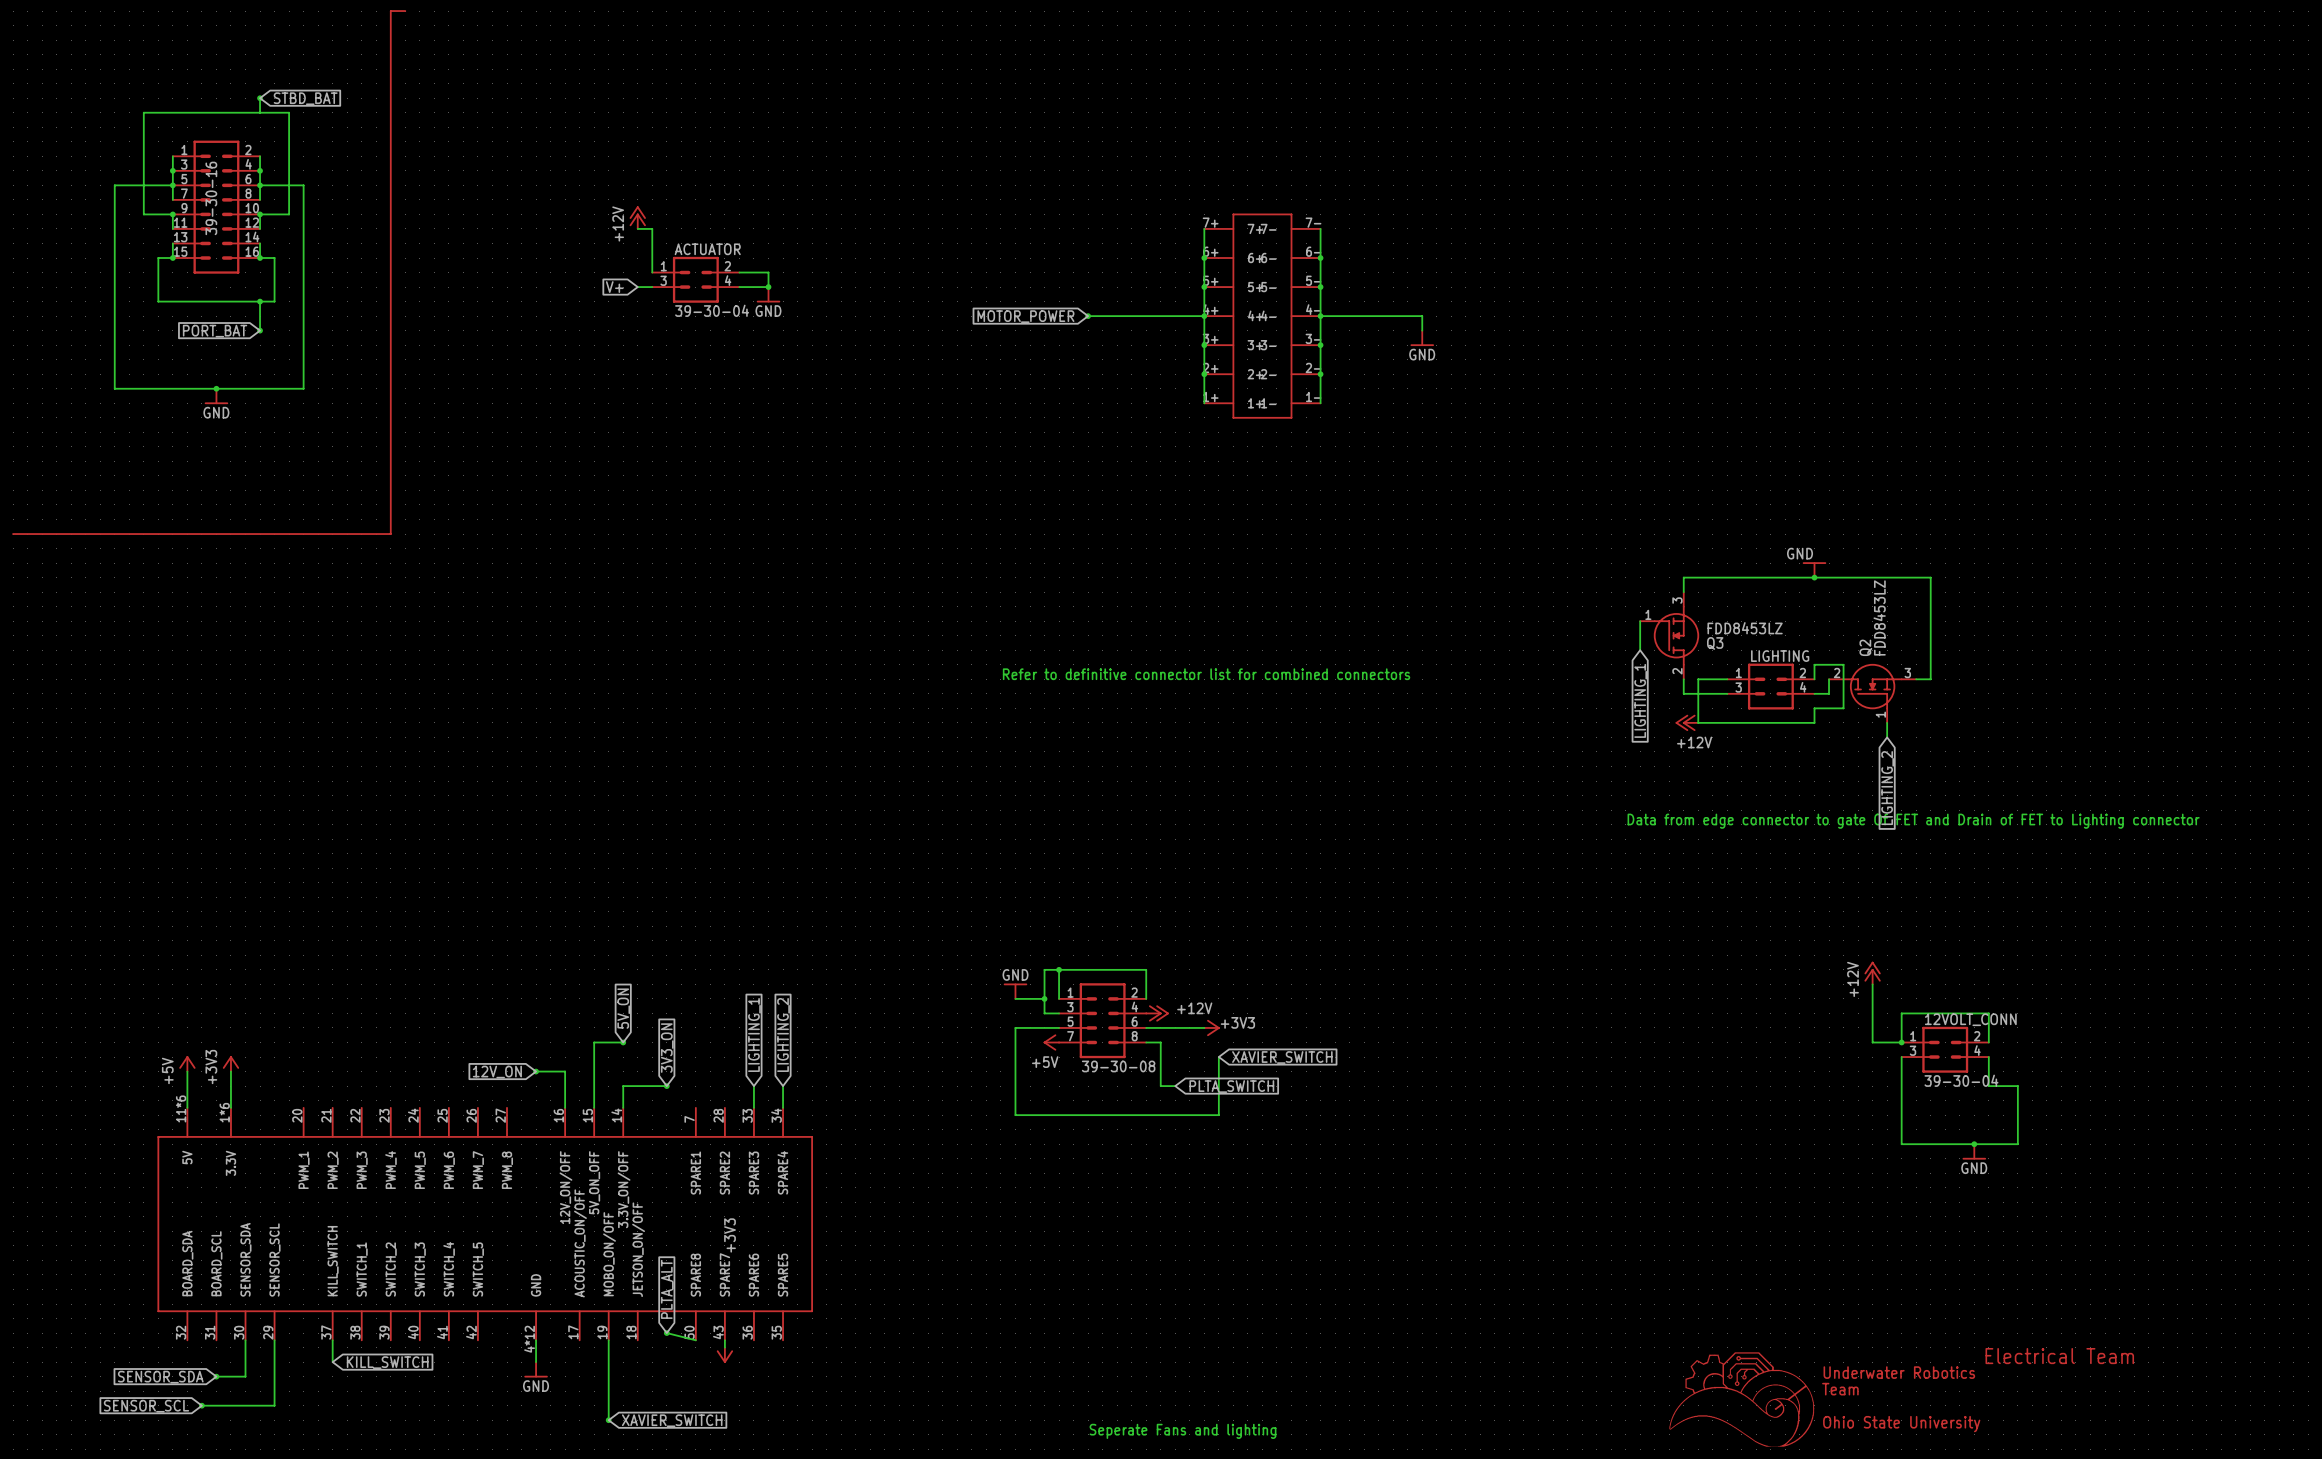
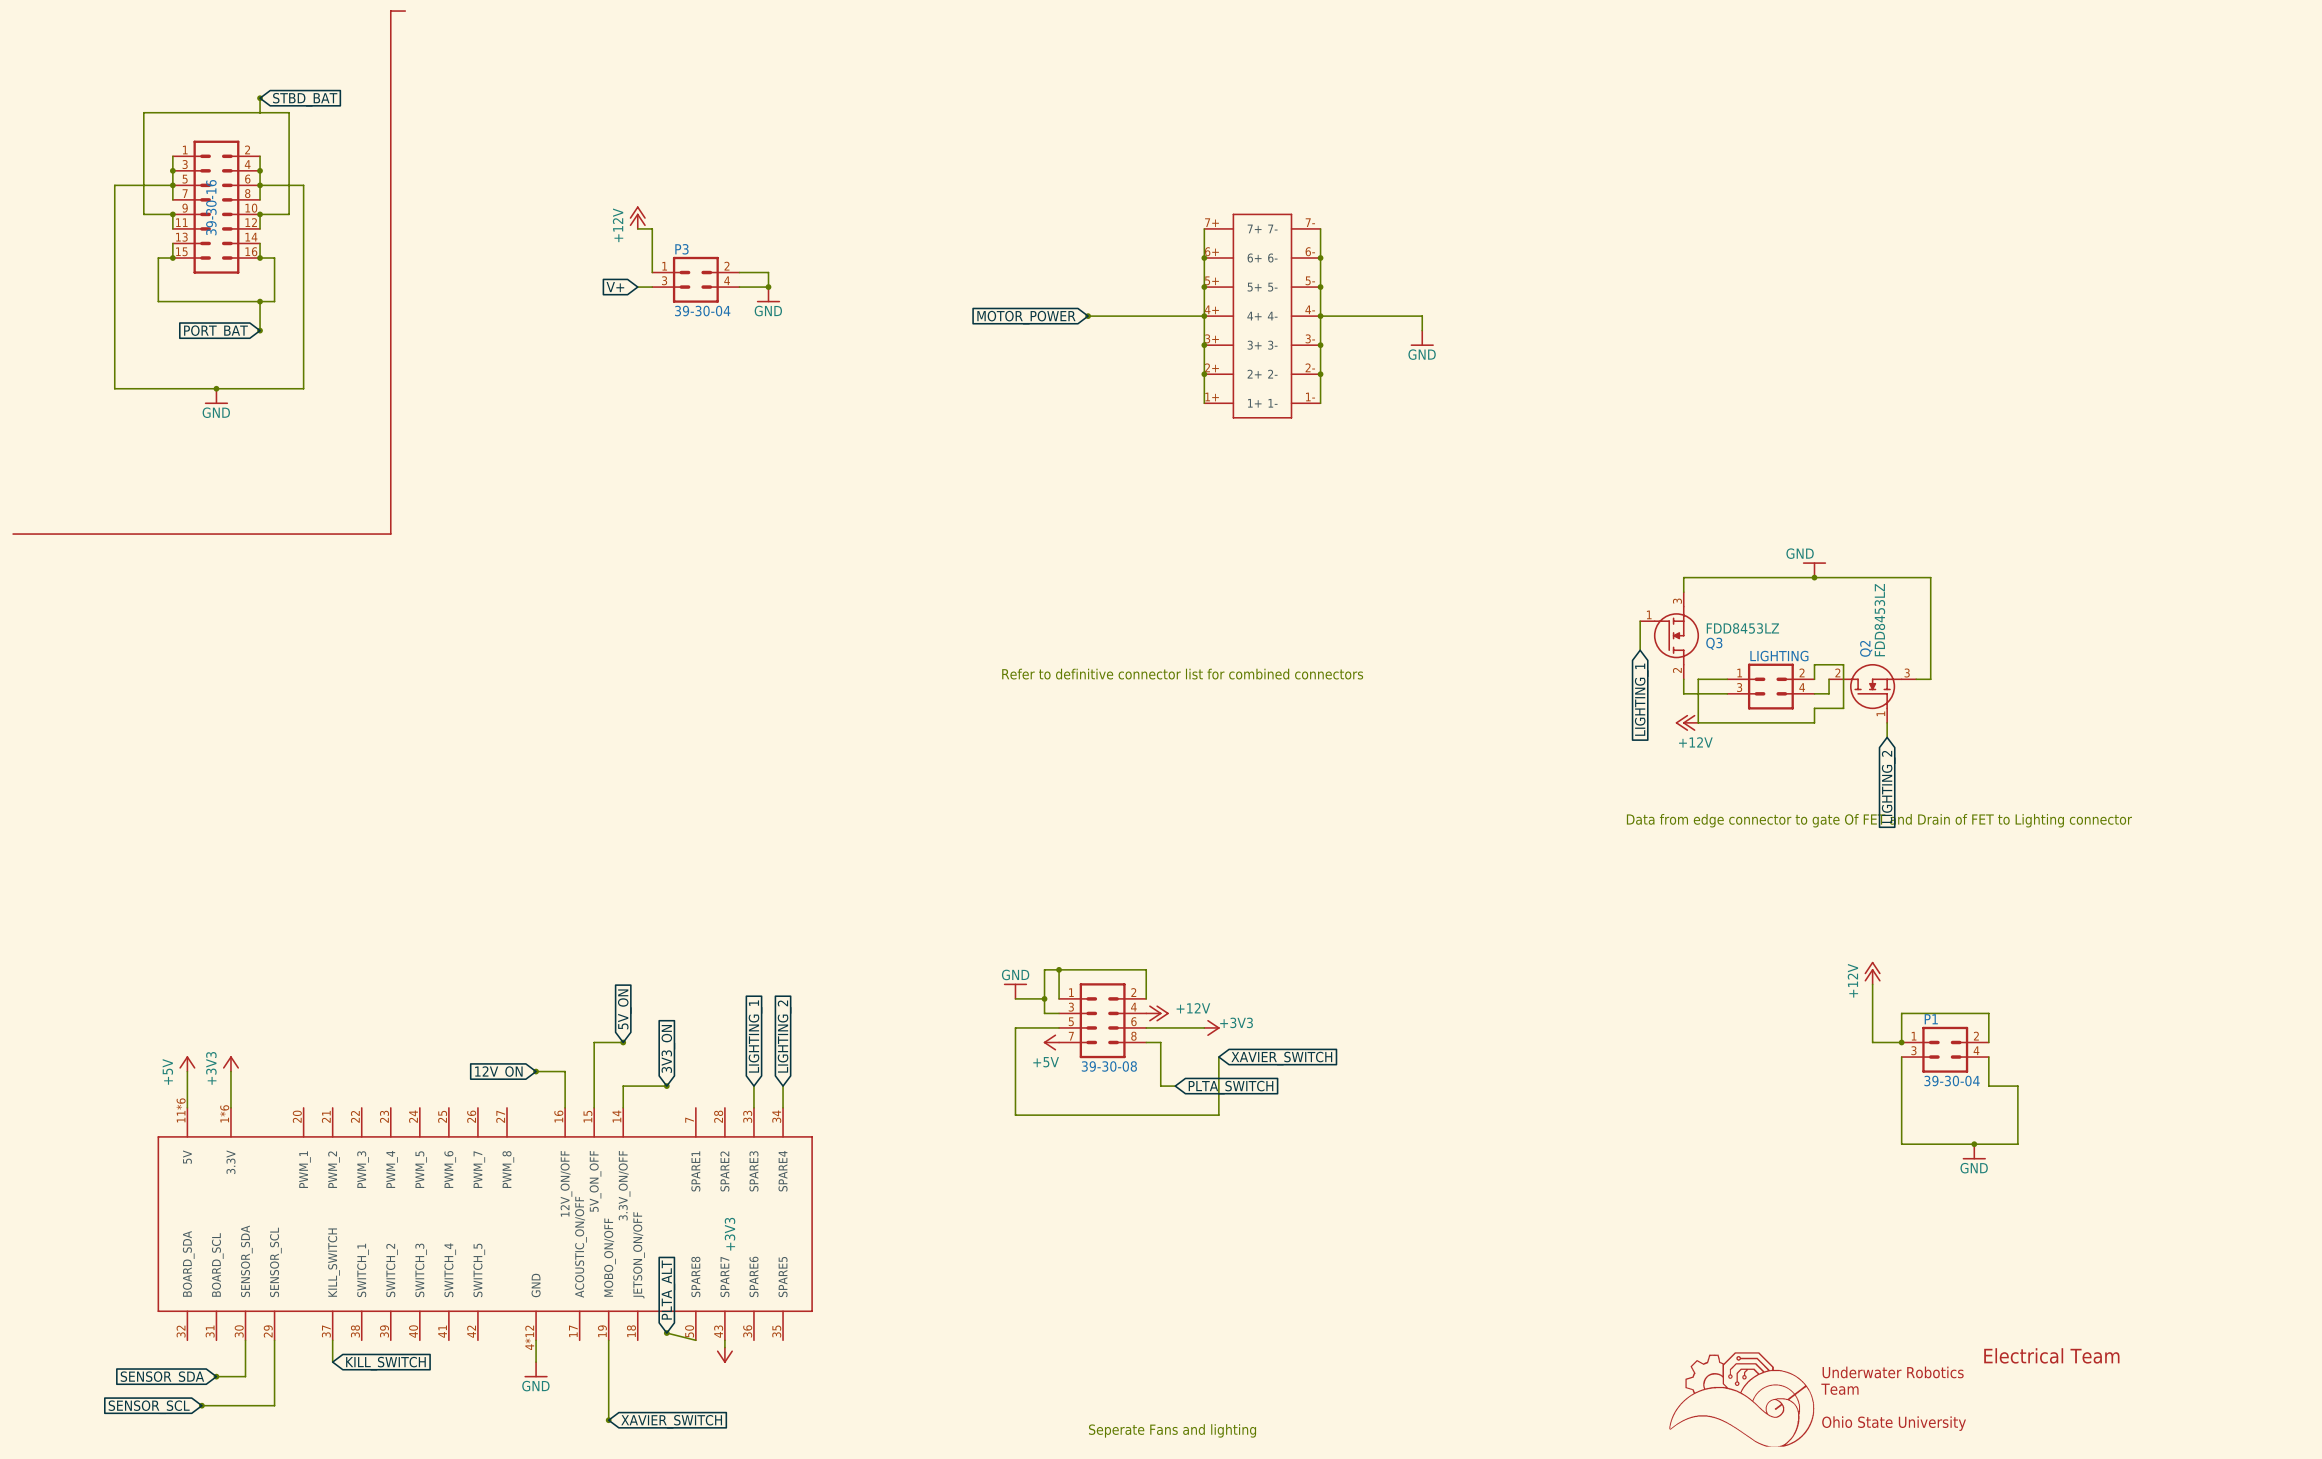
ACTUATOR name: ACTUATOR (707, 249) -> P3 (681, 249)
12VOLT_CONN name: 12VOLT_CONN (1970, 1019) -> P1 (1931, 1019)

